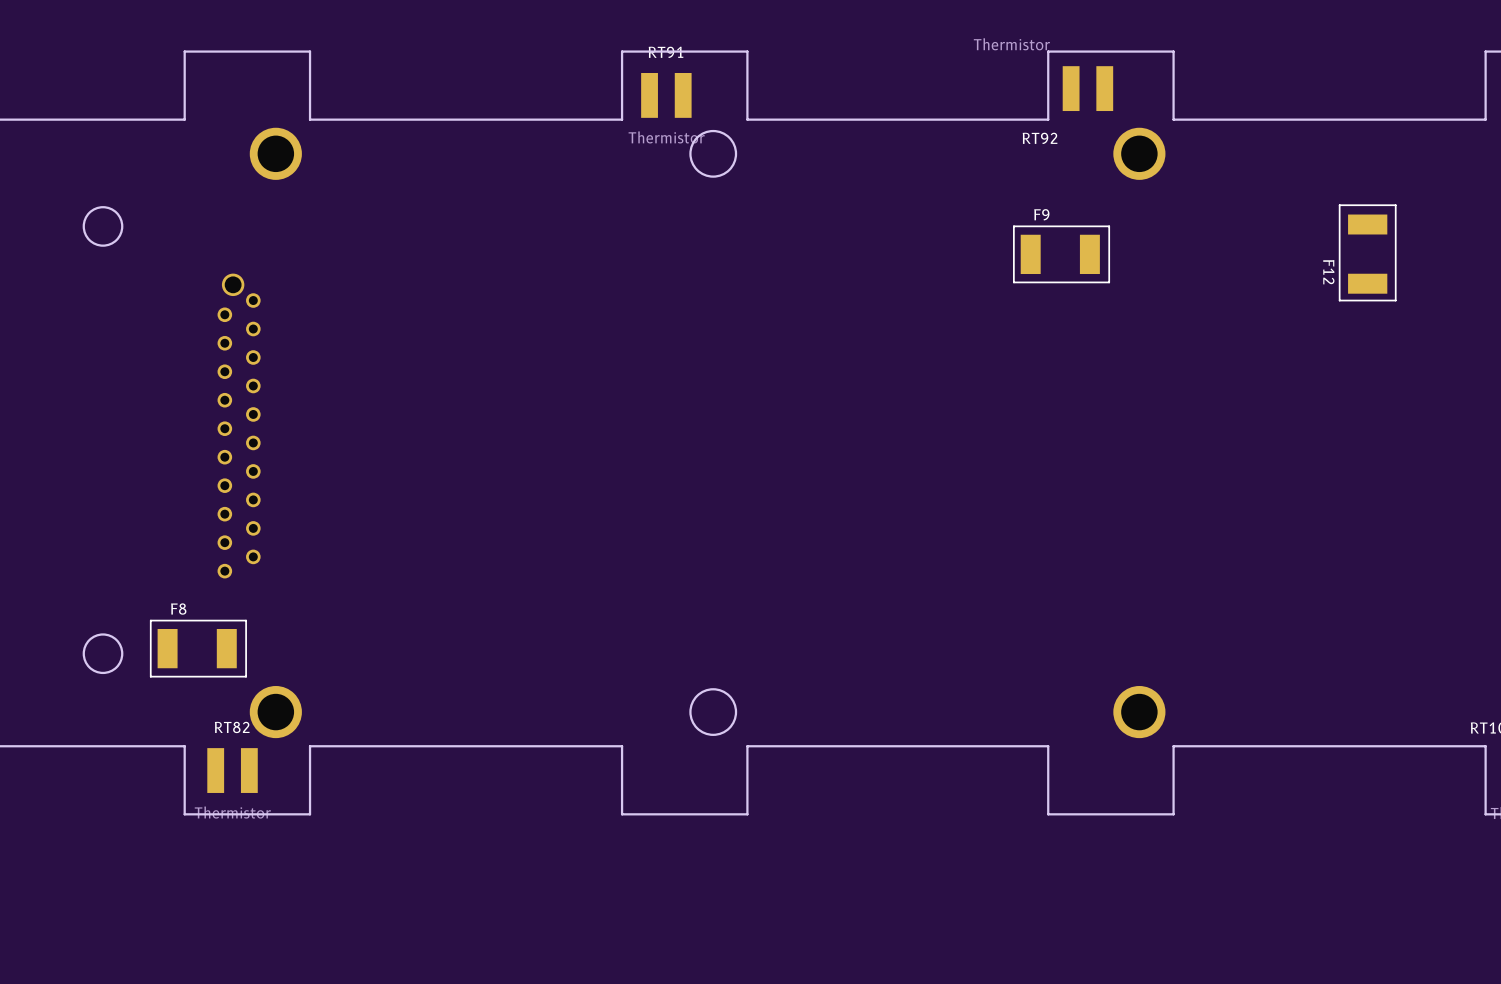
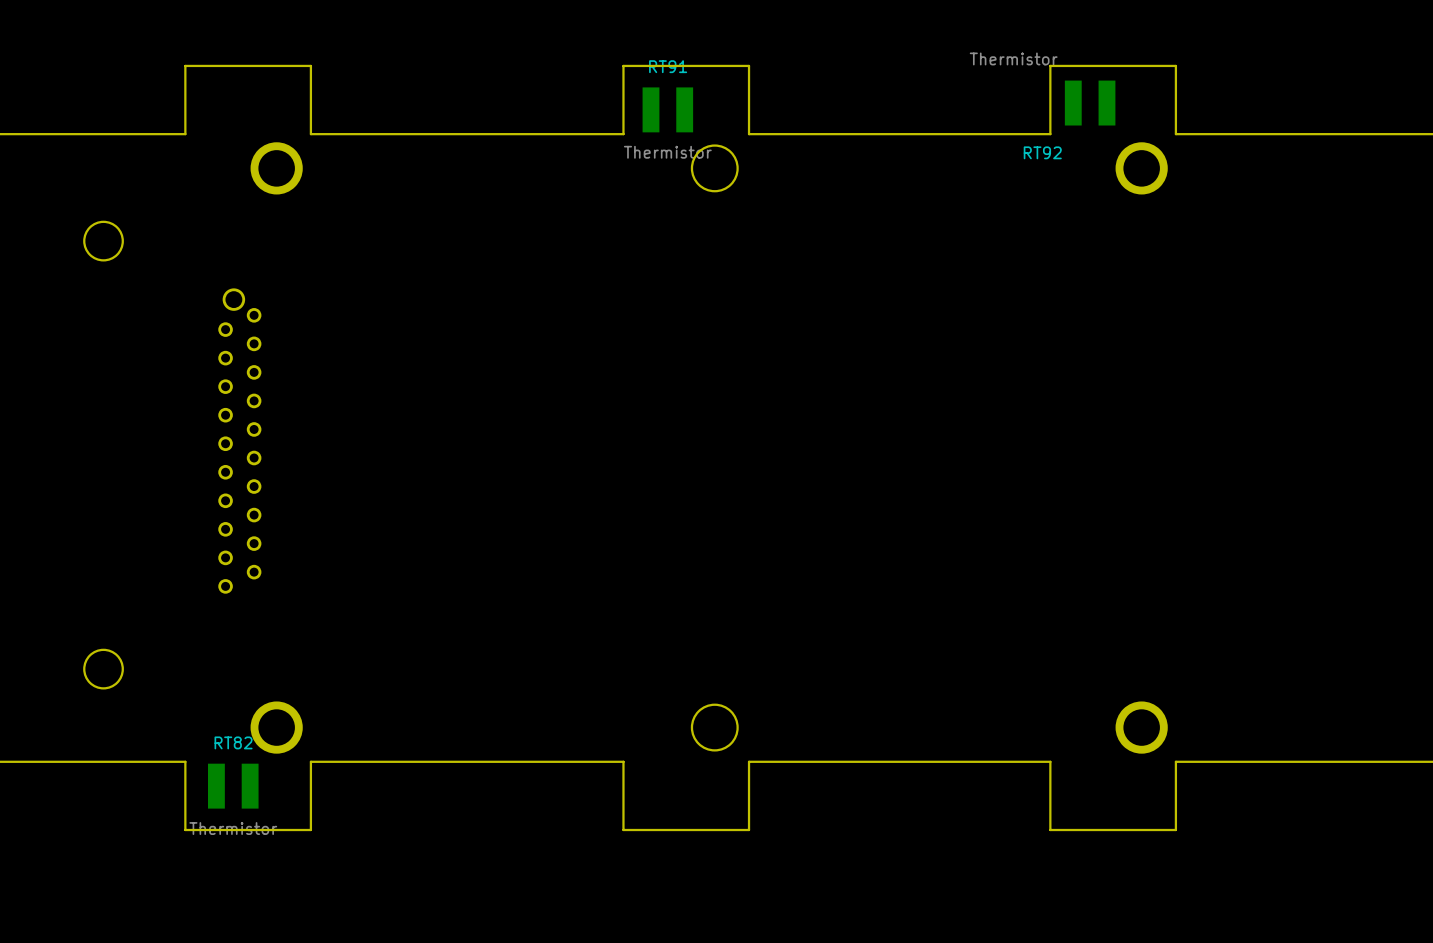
F12: (1367, 252) -> none
F9: (1061, 254) -> none
F8: (198, 648) -> none

